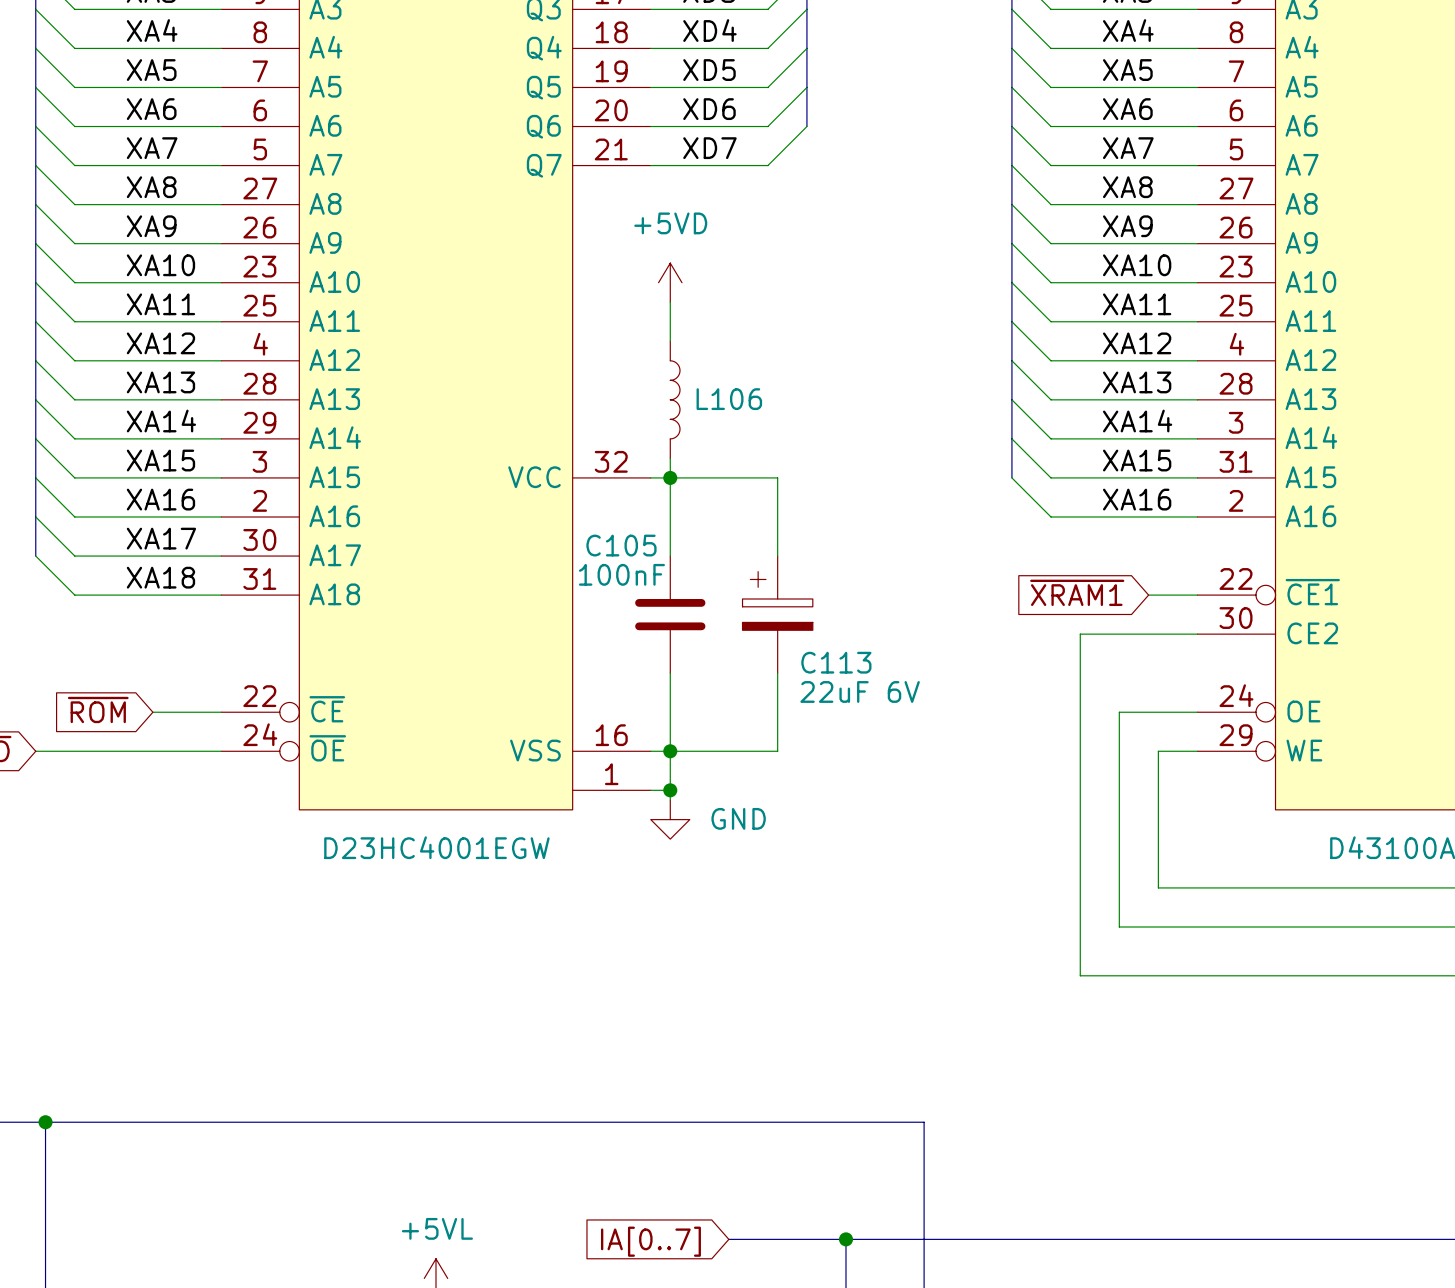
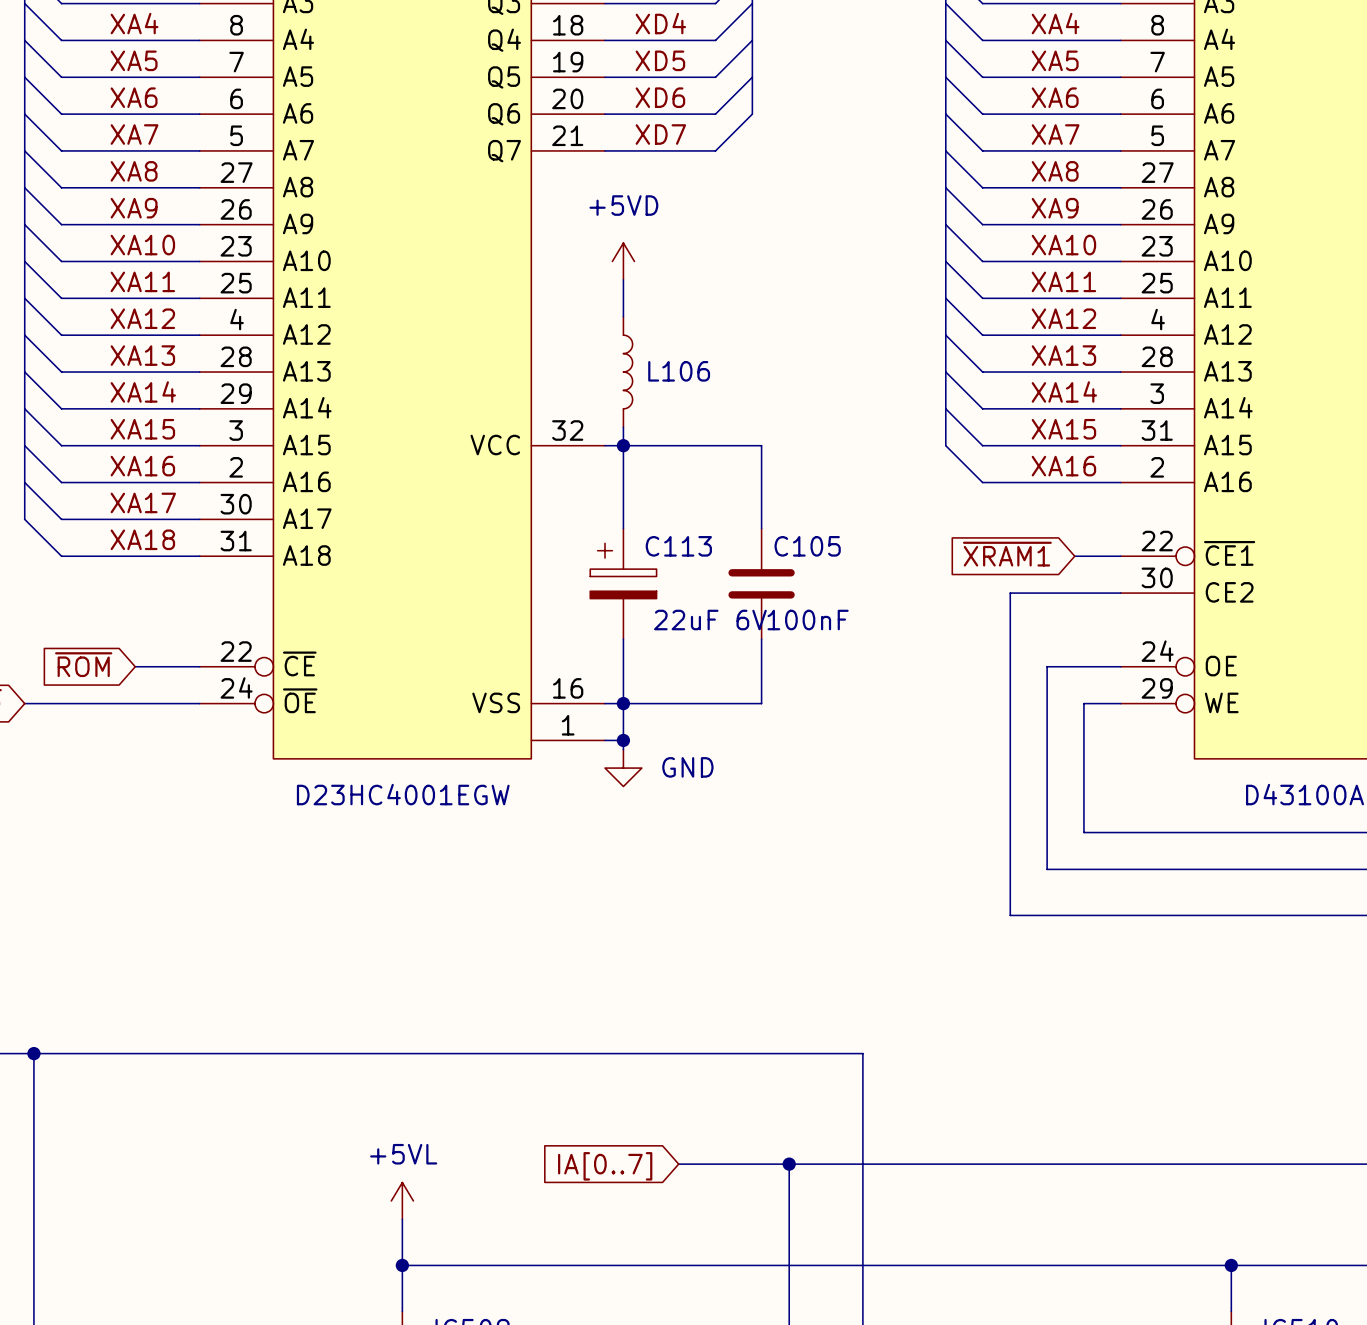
wire: (777, 477) (777, 556) -> (724, 445) (761, 445) (761, 528)
C105 name position: C105 (621, 545) -> C105 (807, 546)
C105 value position: 100nF (621, 574) -> 100nF (808, 620)
C105 position: (670, 614) -> (761, 583)
C113 position: (777, 614) -> (623, 583)
C113 name position: C113 (836, 662) -> C113 (678, 546)
wire: (777, 673) (777, 751) -> (761, 639) (761, 703) (724, 703)
C113 value position: 22uF 6V (860, 691) -> 22uF 6V (710, 620)

